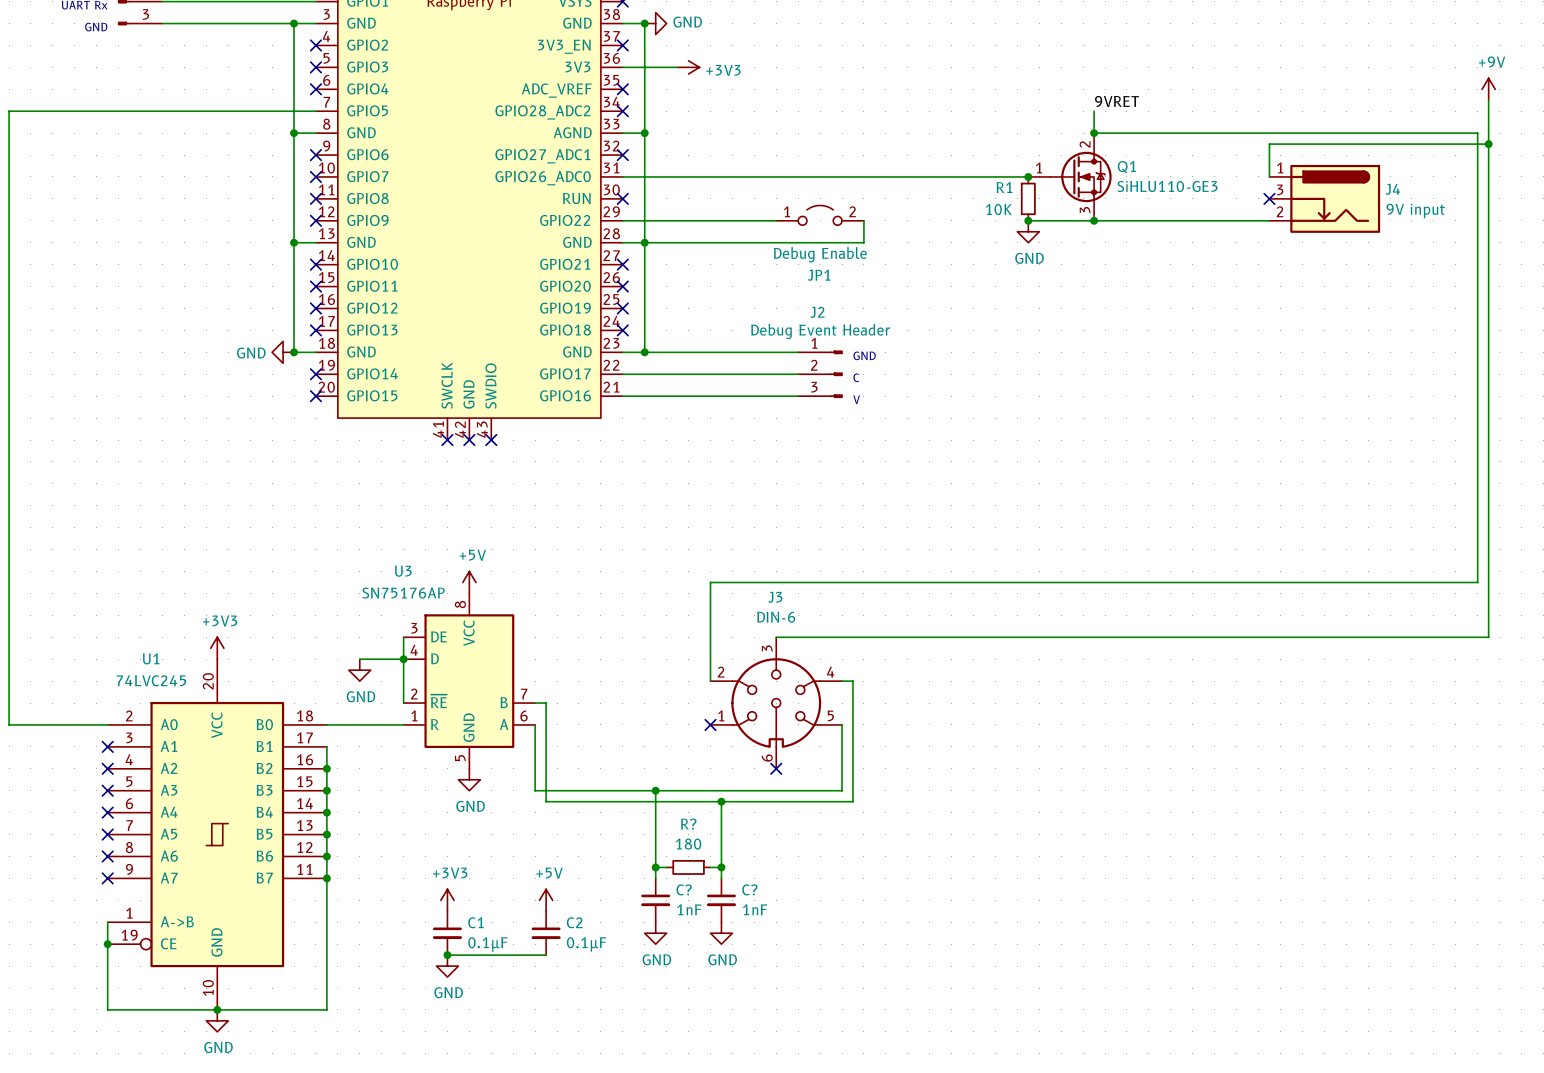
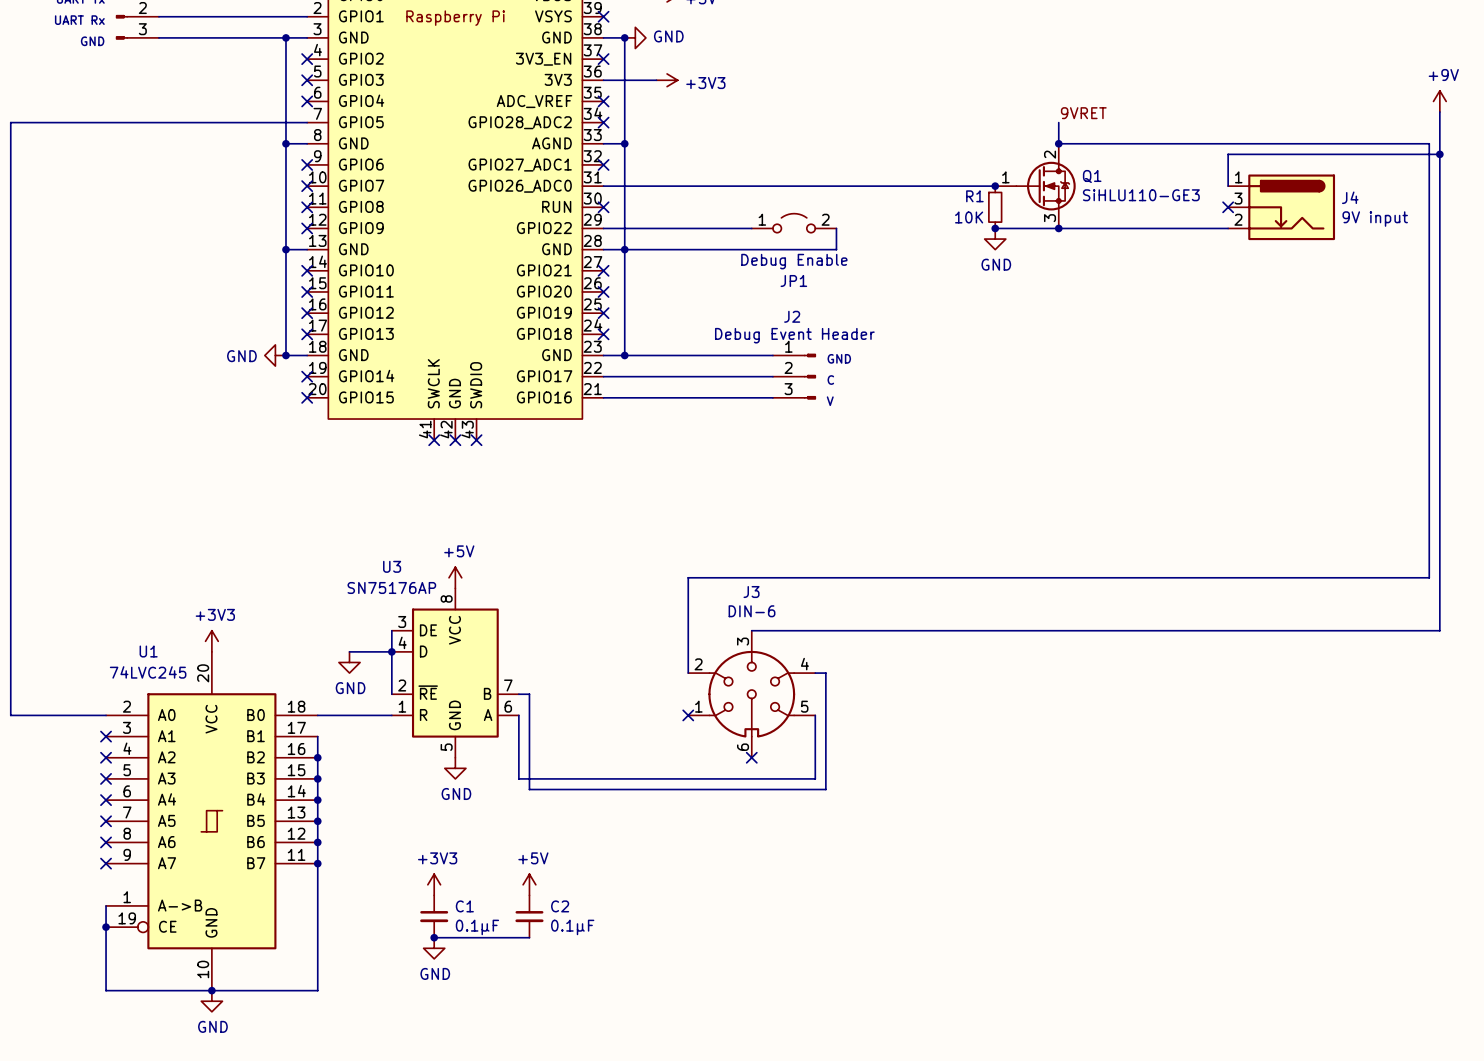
wire: (655, 790) (655, 878) -> none
junction: (655, 790) -> none
wire: (721, 801) (721, 878) -> none
junction: (721, 801) -> none
wire: (655, 867) (666, 867) -> none
junction: (655, 867) -> none
R?: 180 (688, 867) -> none
wire: (710, 867) (721, 867) -> none
junction: (721, 867) -> none
C?: 1nF (655, 900) -> none
C?: 1nF (721, 900) -> none
power symbol: GND (655, 933) -> none
power symbol: GND (721, 933) -> none

